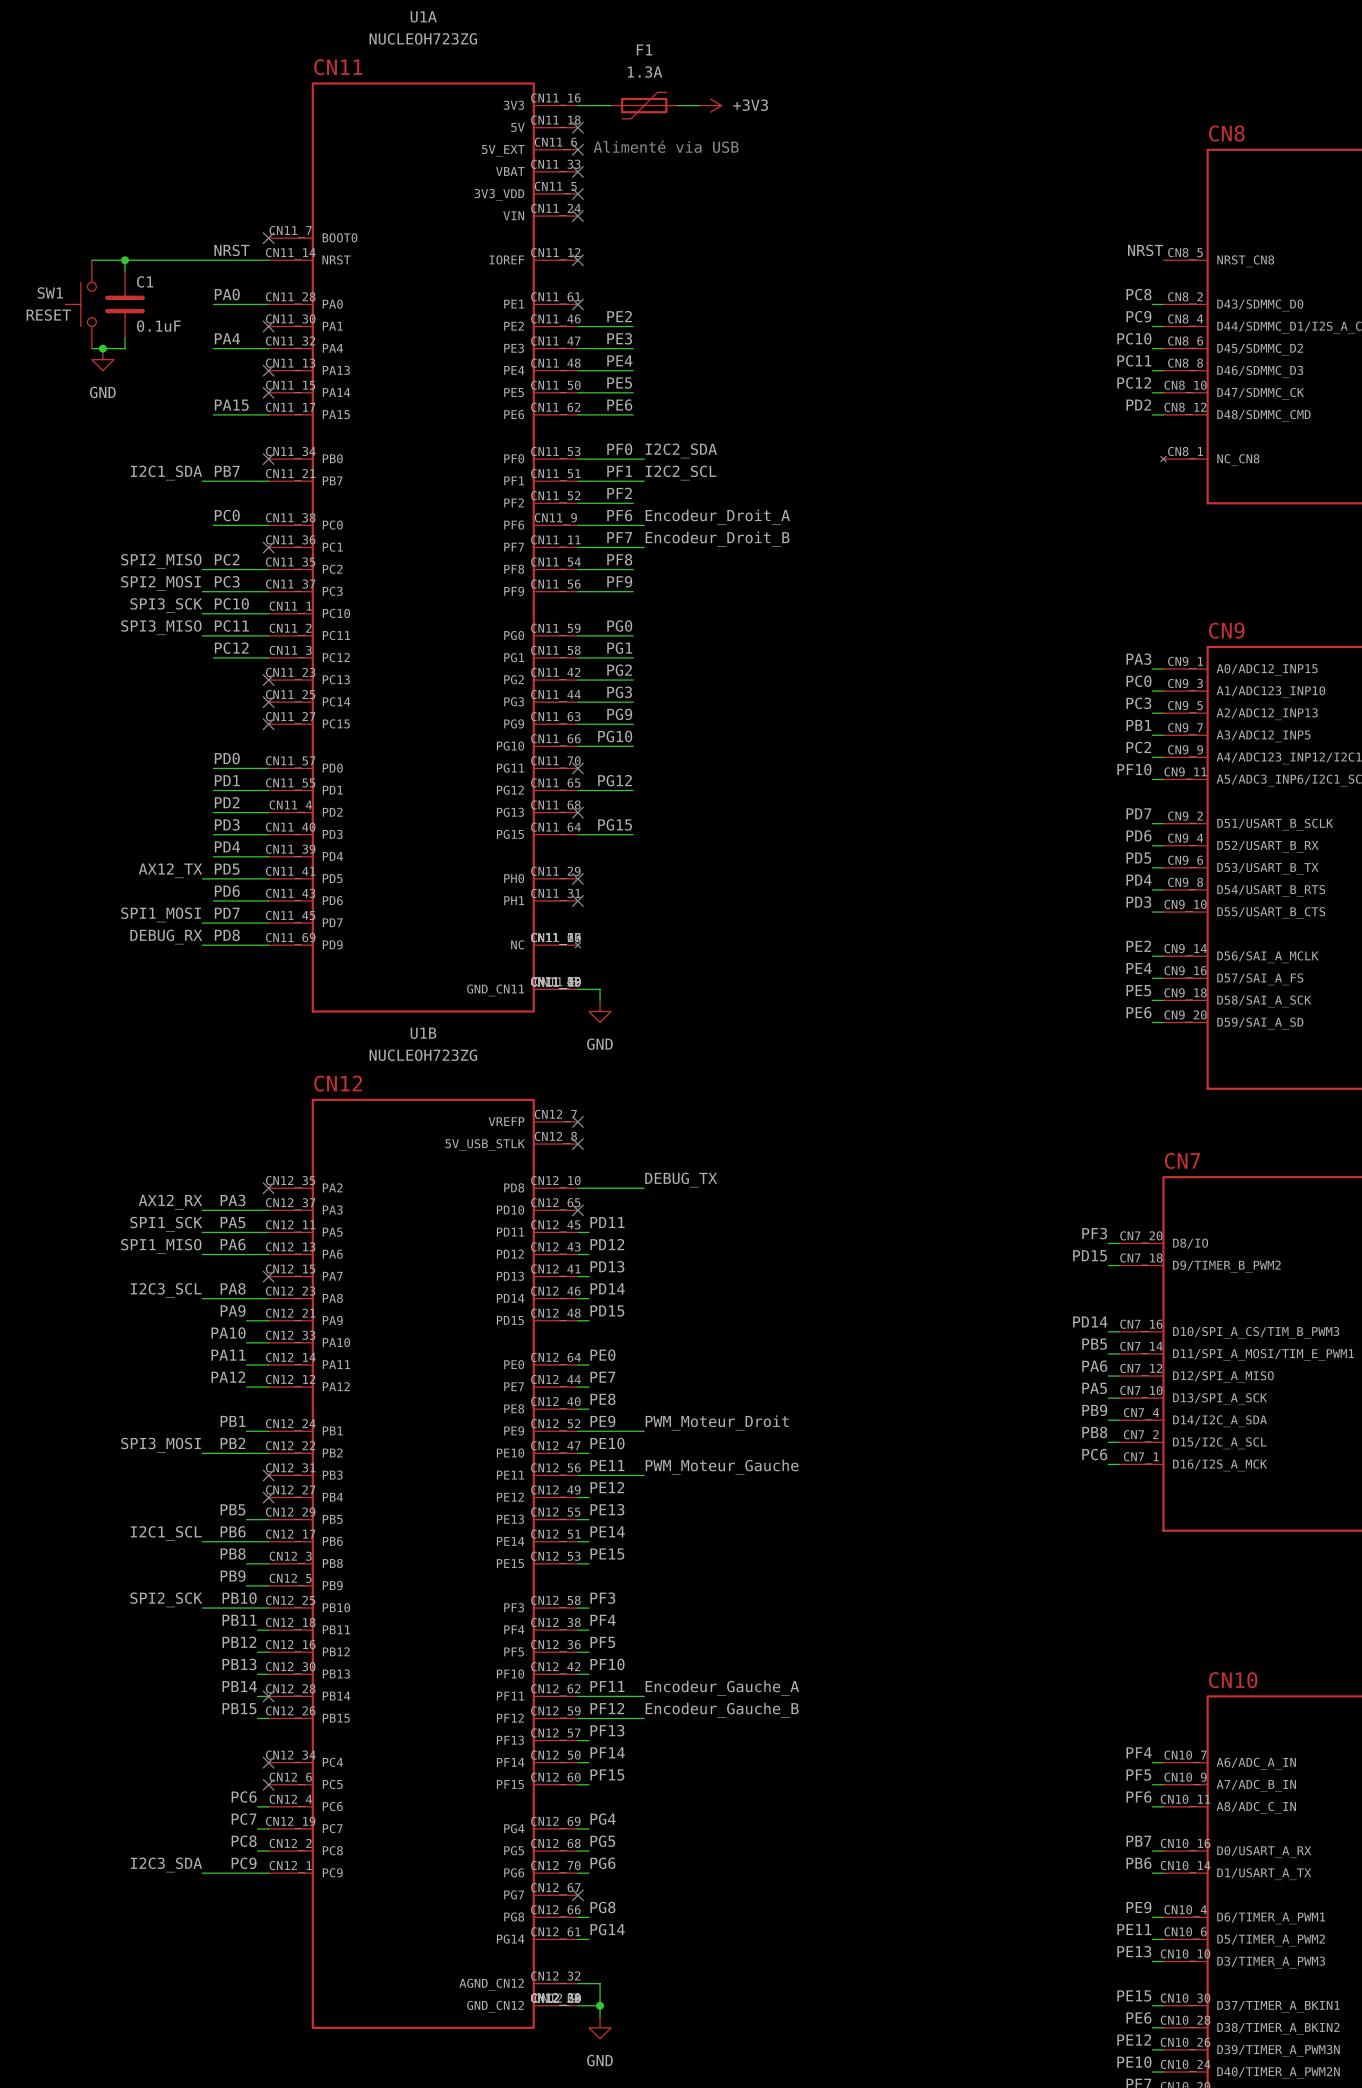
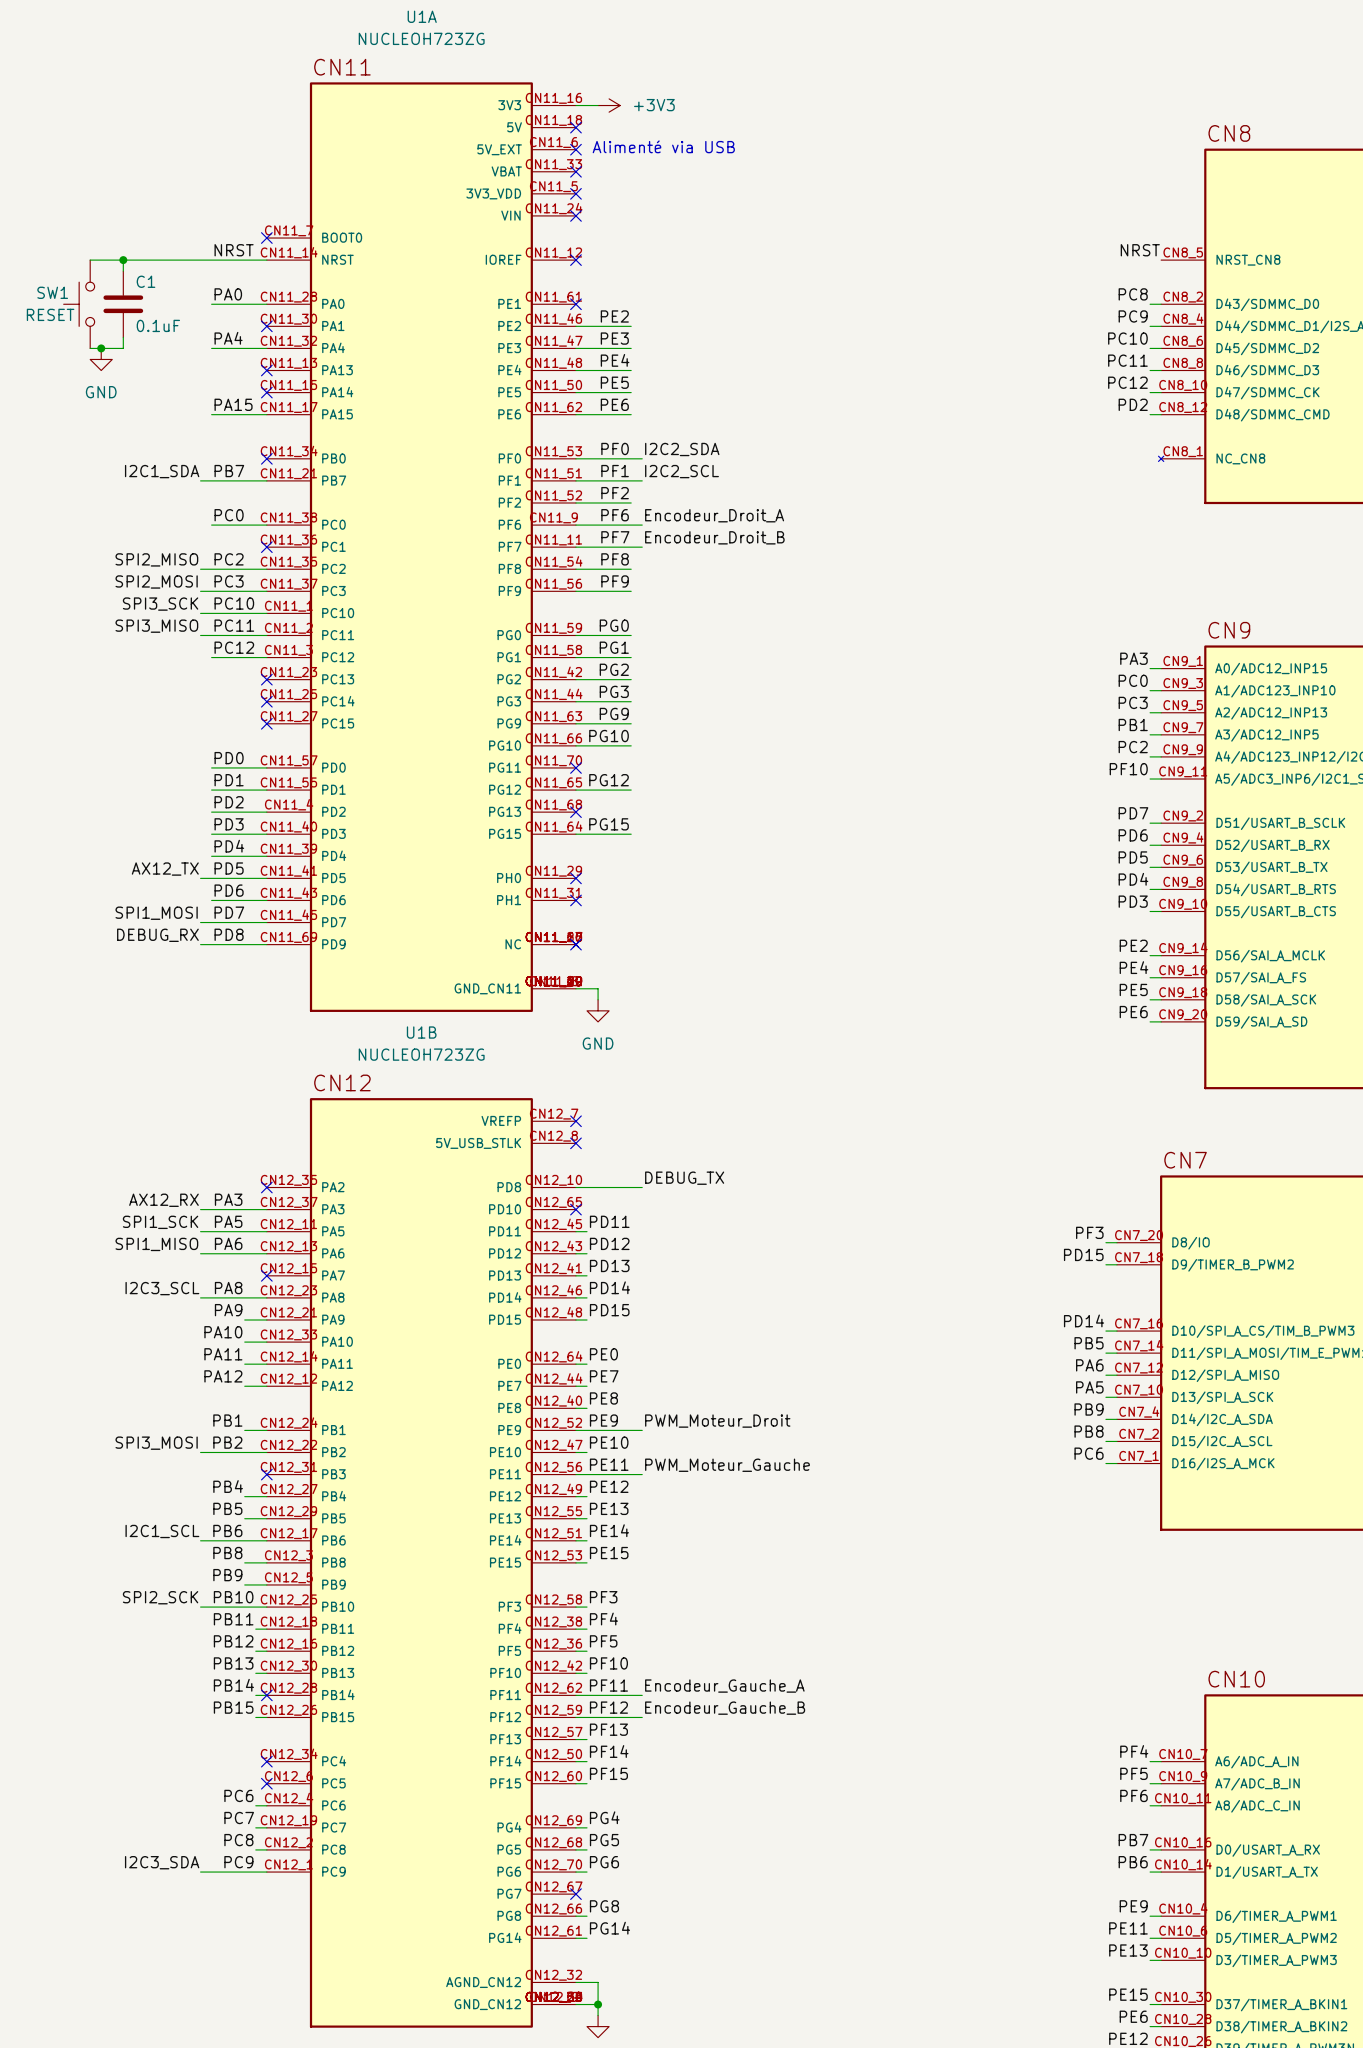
F1: 1.3A (644, 105) -> none
wire: (677, 105) (699, 105) -> none
power symbol position: +3V3 (710, 105) -> +3V3 (609, 105)
no-connect mark: none -> (575, 944)
label: none -> PB4 (228, 1486)
wire: none -> (244, 1496) (266, 1496)
no-connect mark: (268, 1497) -> none

